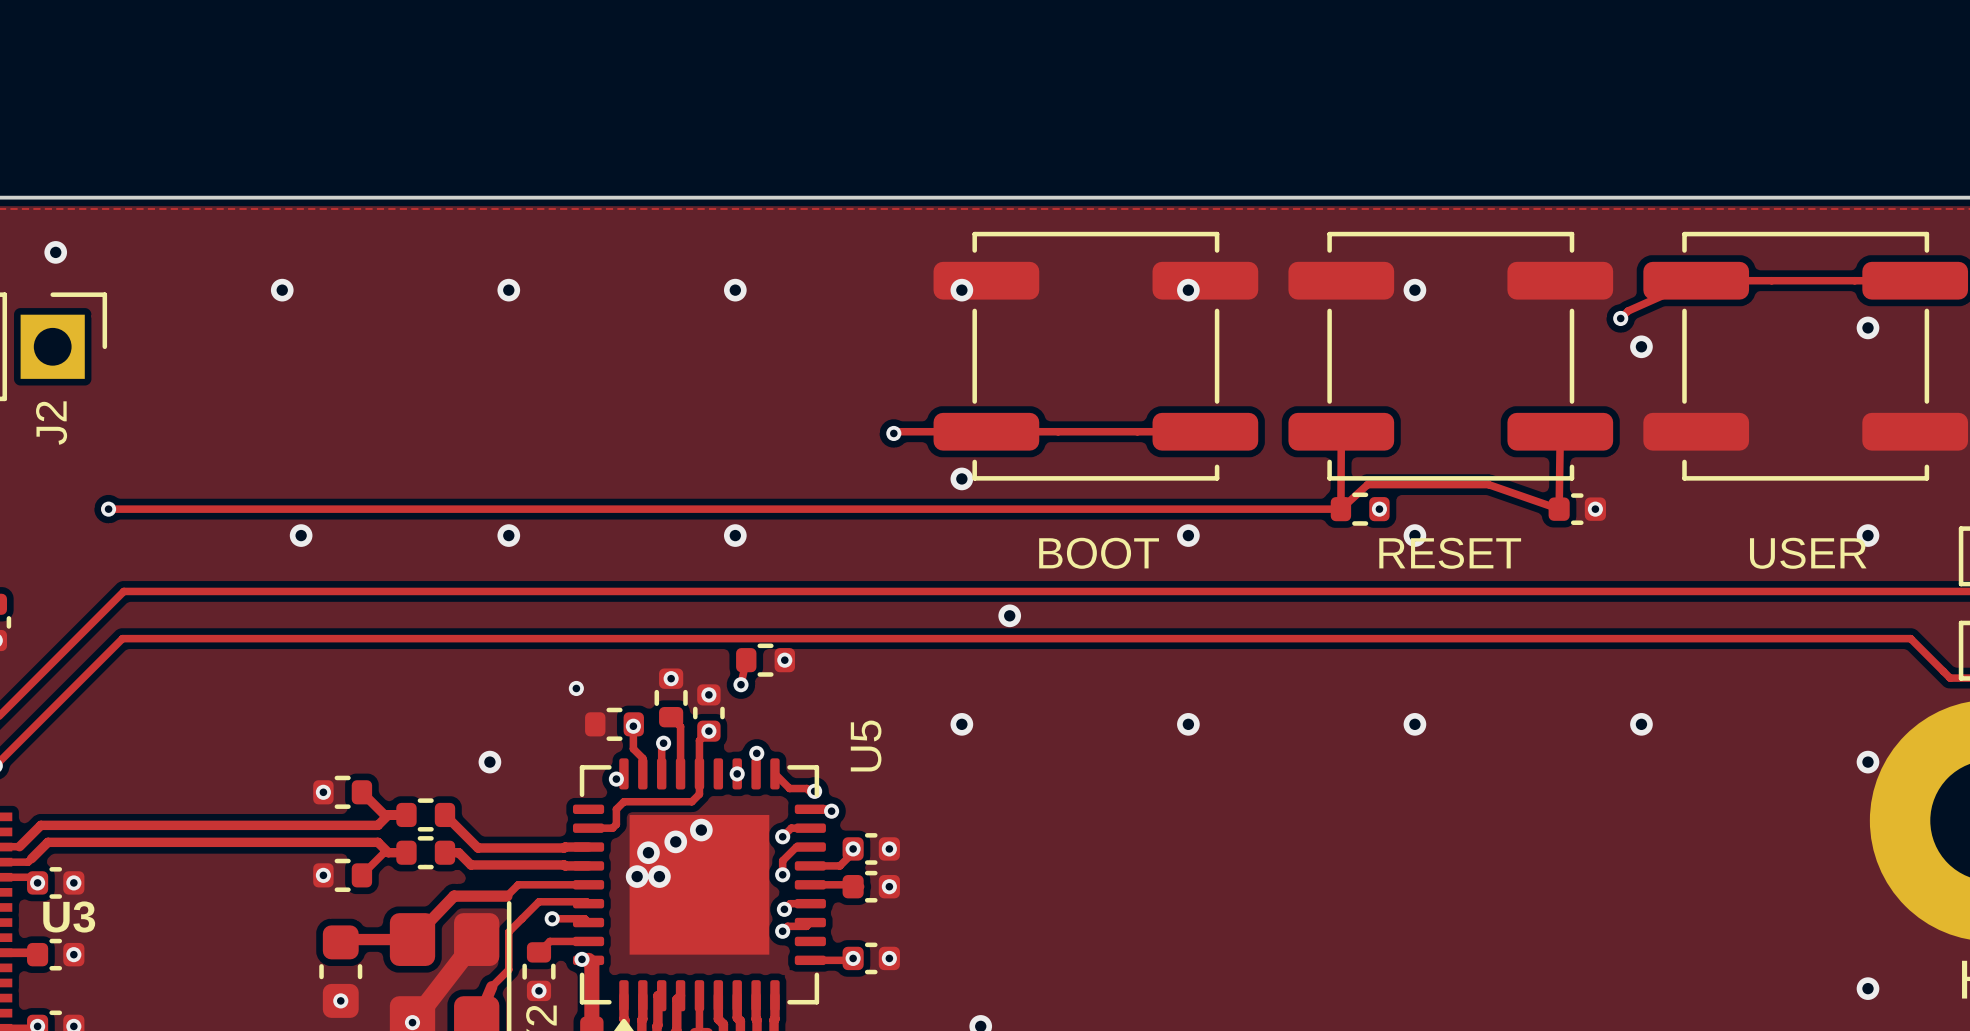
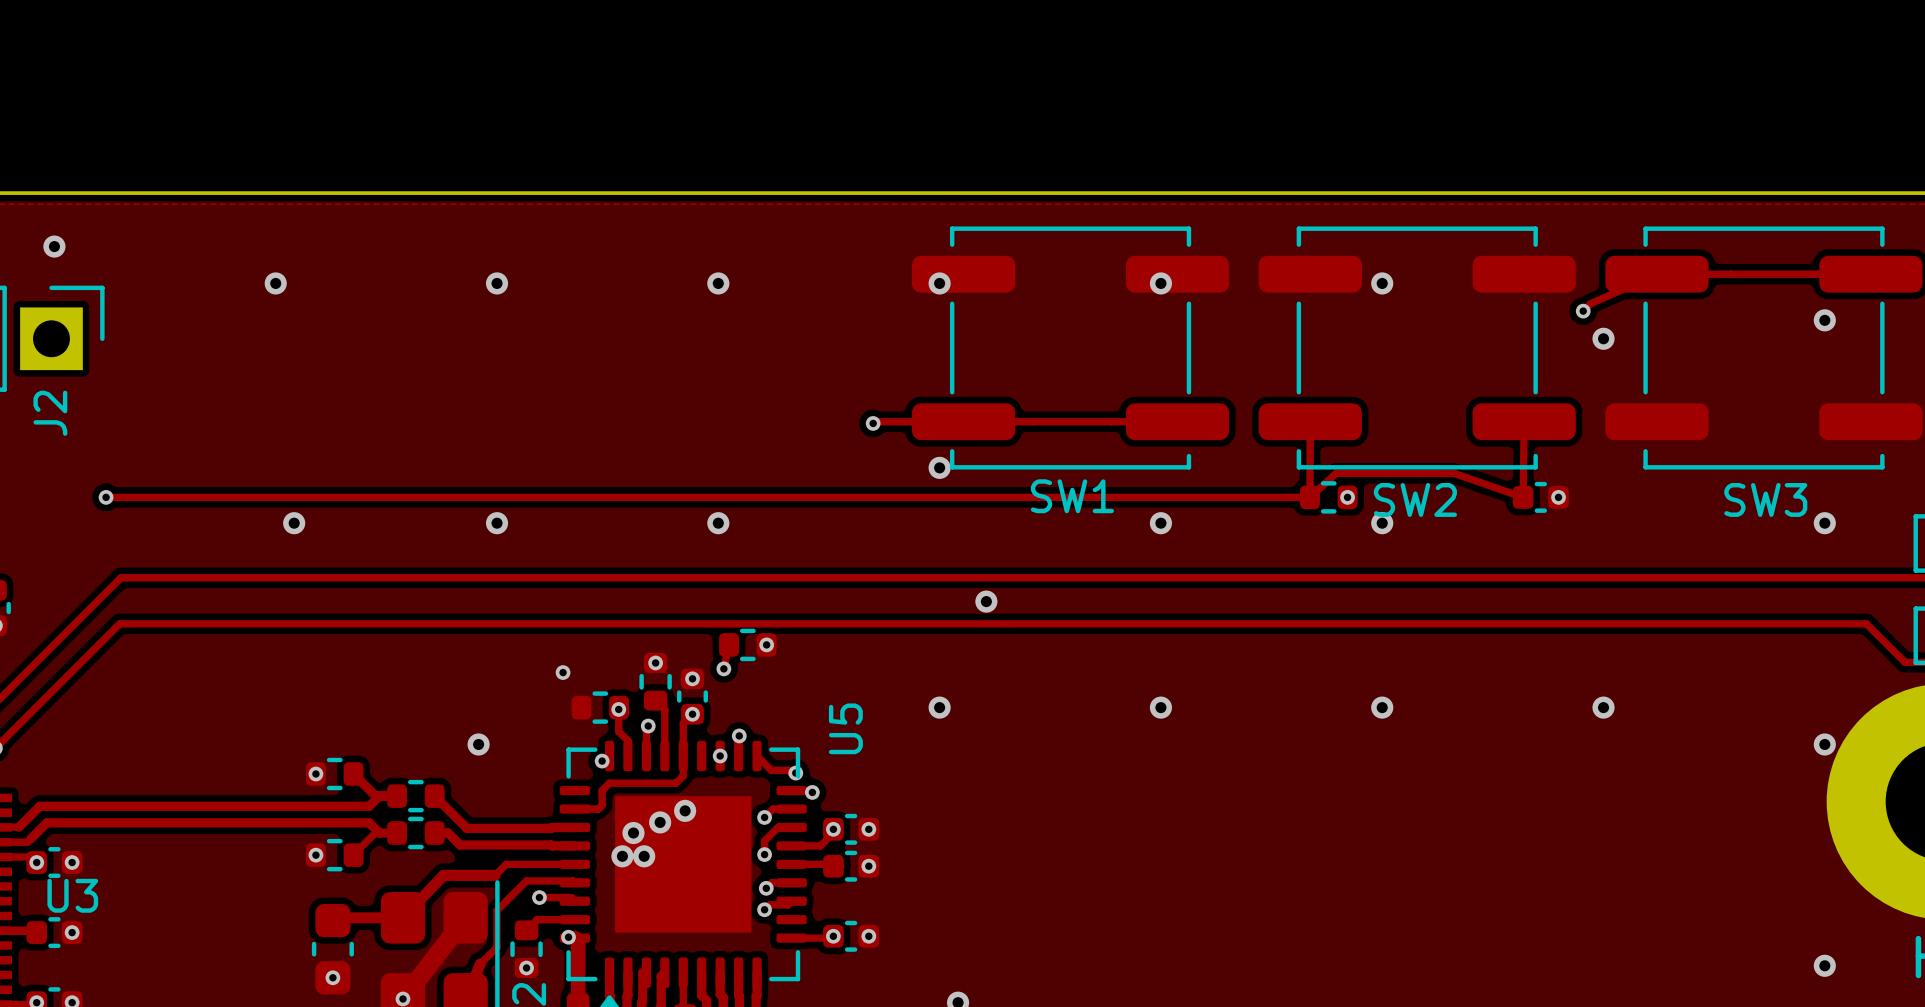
BOOT name: BOOT (1099, 553) -> SW1 (1072, 496)
RESET name: RESET (1450, 553) -> SW2 (1415, 499)
USER name: USER (1808, 553) -> SW3 (1765, 499)

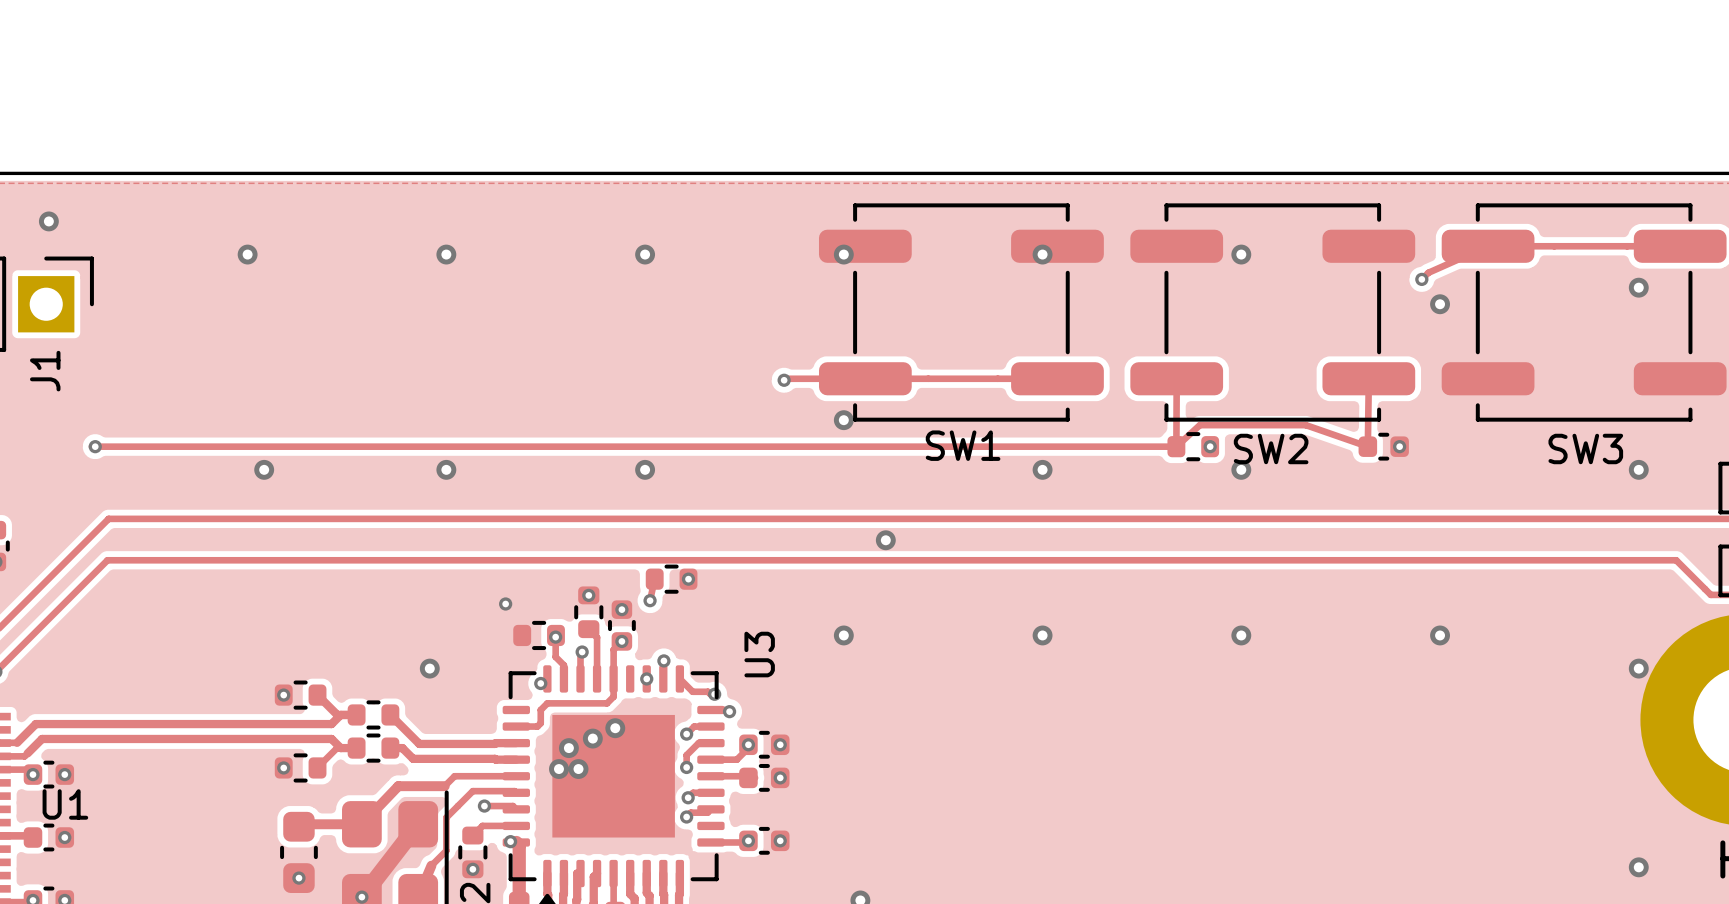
J2 name: J2 (50, 413) -> J1 (45, 371)
U5 name: U5 (845, 728) -> U3 (759, 654)
U3 name: U3 (72, 895) -> U1 (65, 804)

